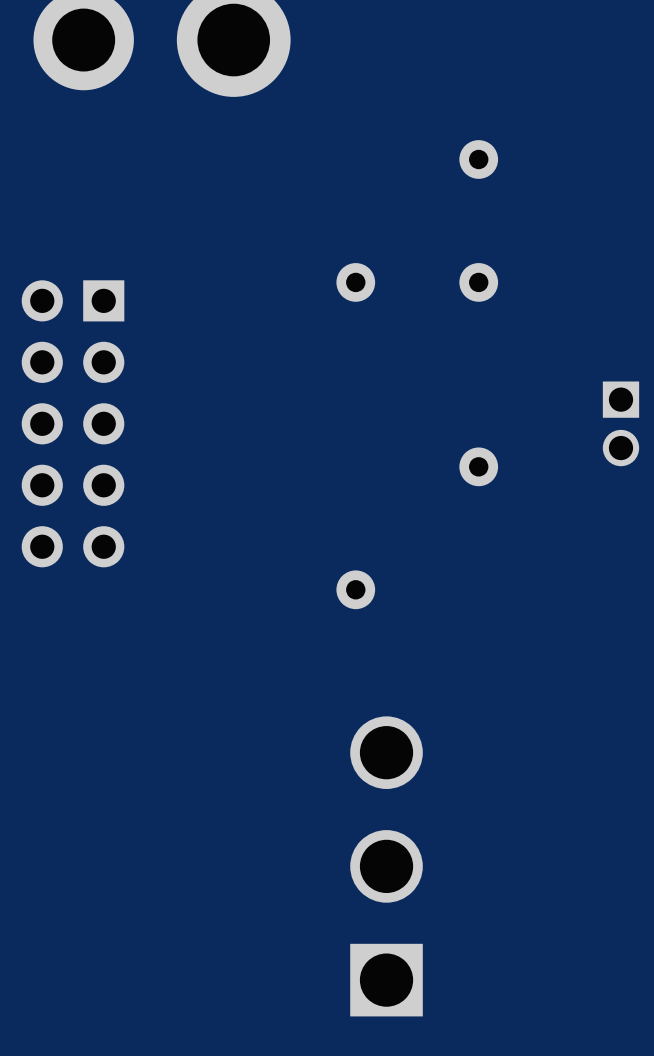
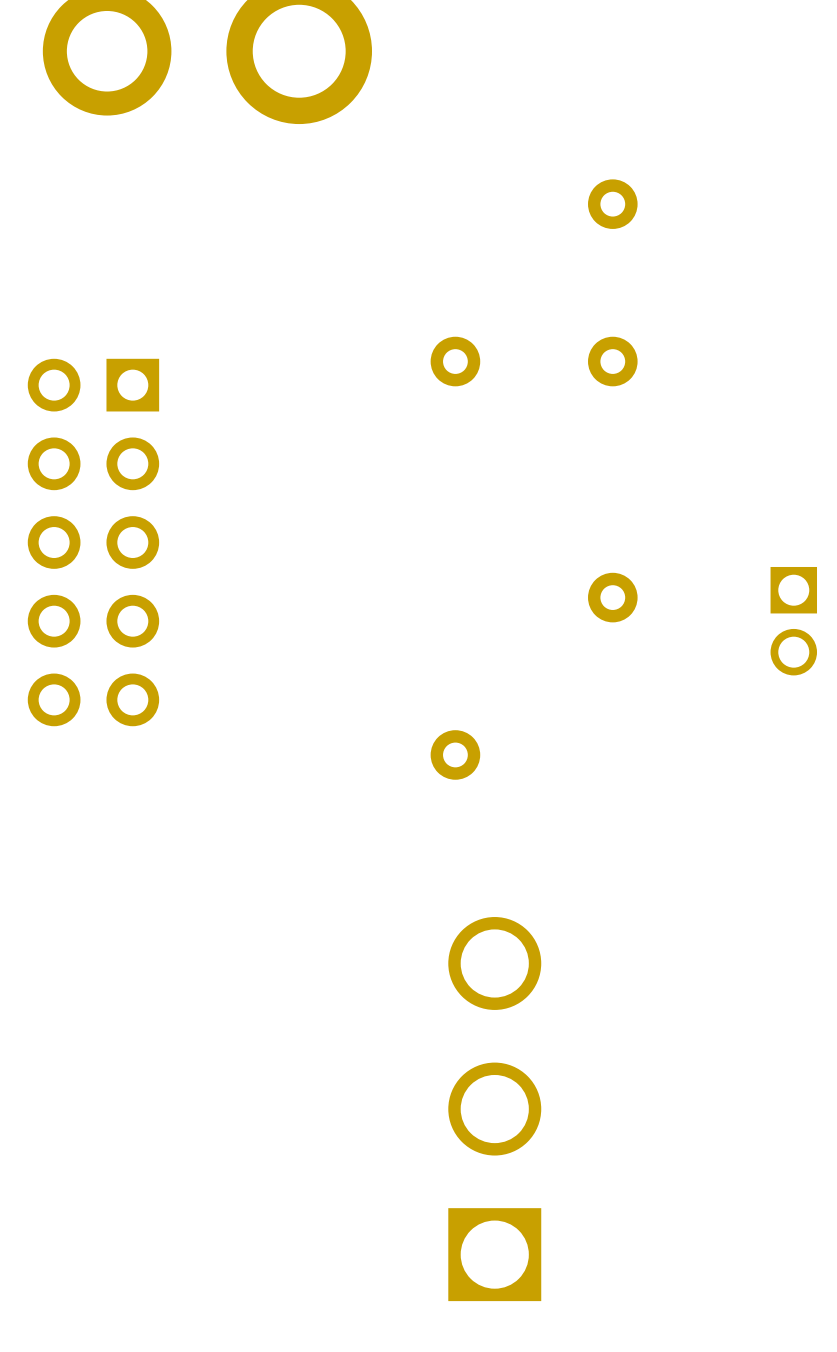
part position: (620, 423) -> (793, 621)

